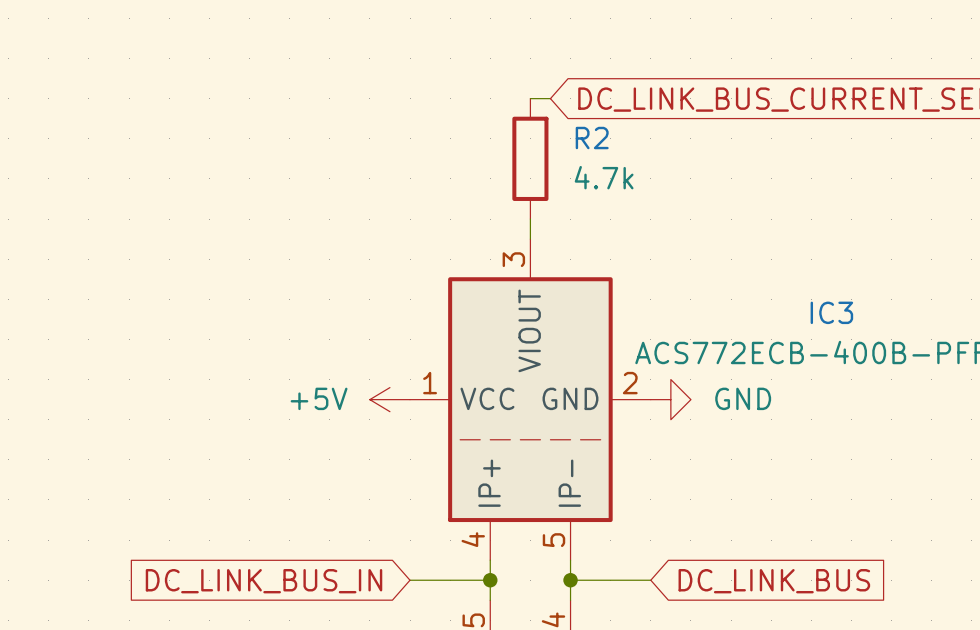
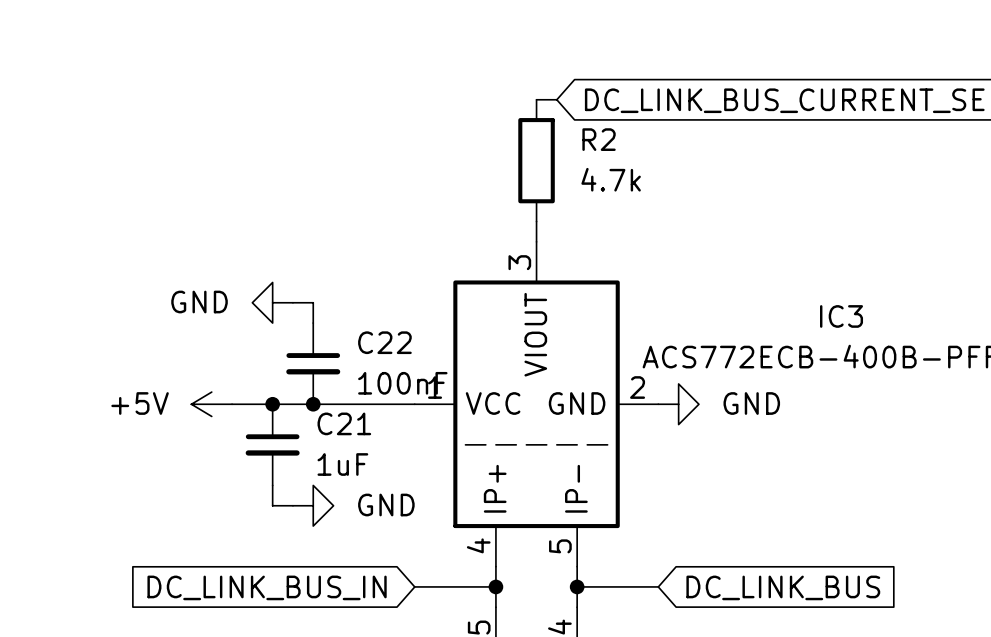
power symbol: none -> GND (272, 302)
wire: none -> (292, 302) (313, 302) (313, 323)
C22: none -> 100nF (313, 363)
wire: none -> (232, 404) (414, 404)
junction: none -> (272, 404)
junction: none -> (313, 404)
power symbol position: +5V (389, 399) -> +5V (211, 404)
C21: none -> 1uF (272, 444)
wire: none -> (272, 485) (272, 505) (292, 505)
power symbol: none -> GND (313, 505)

